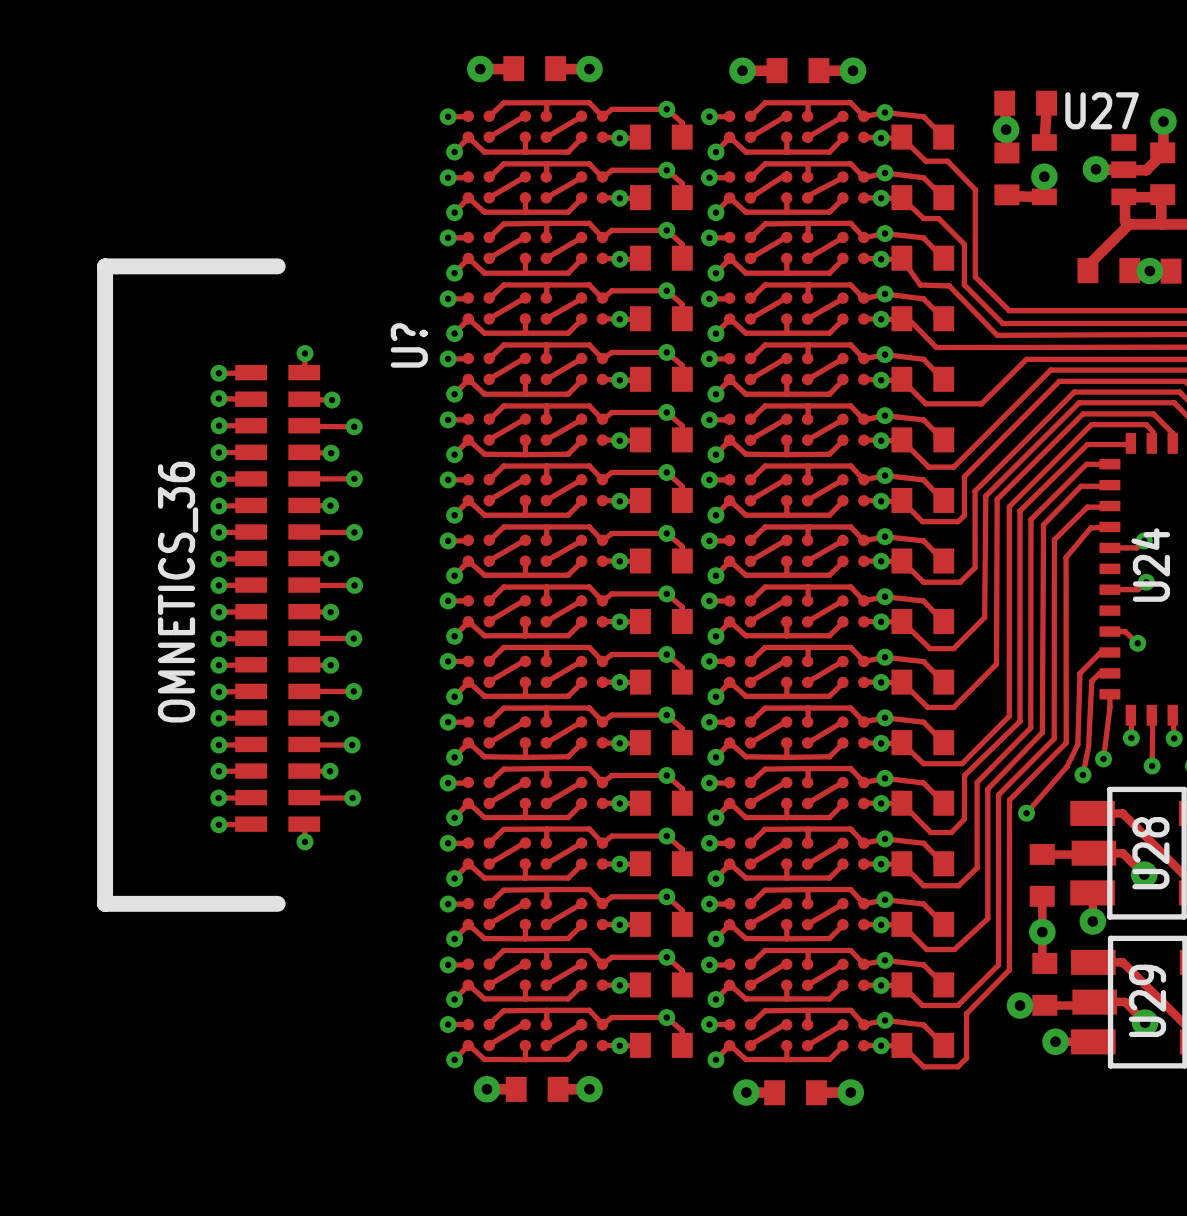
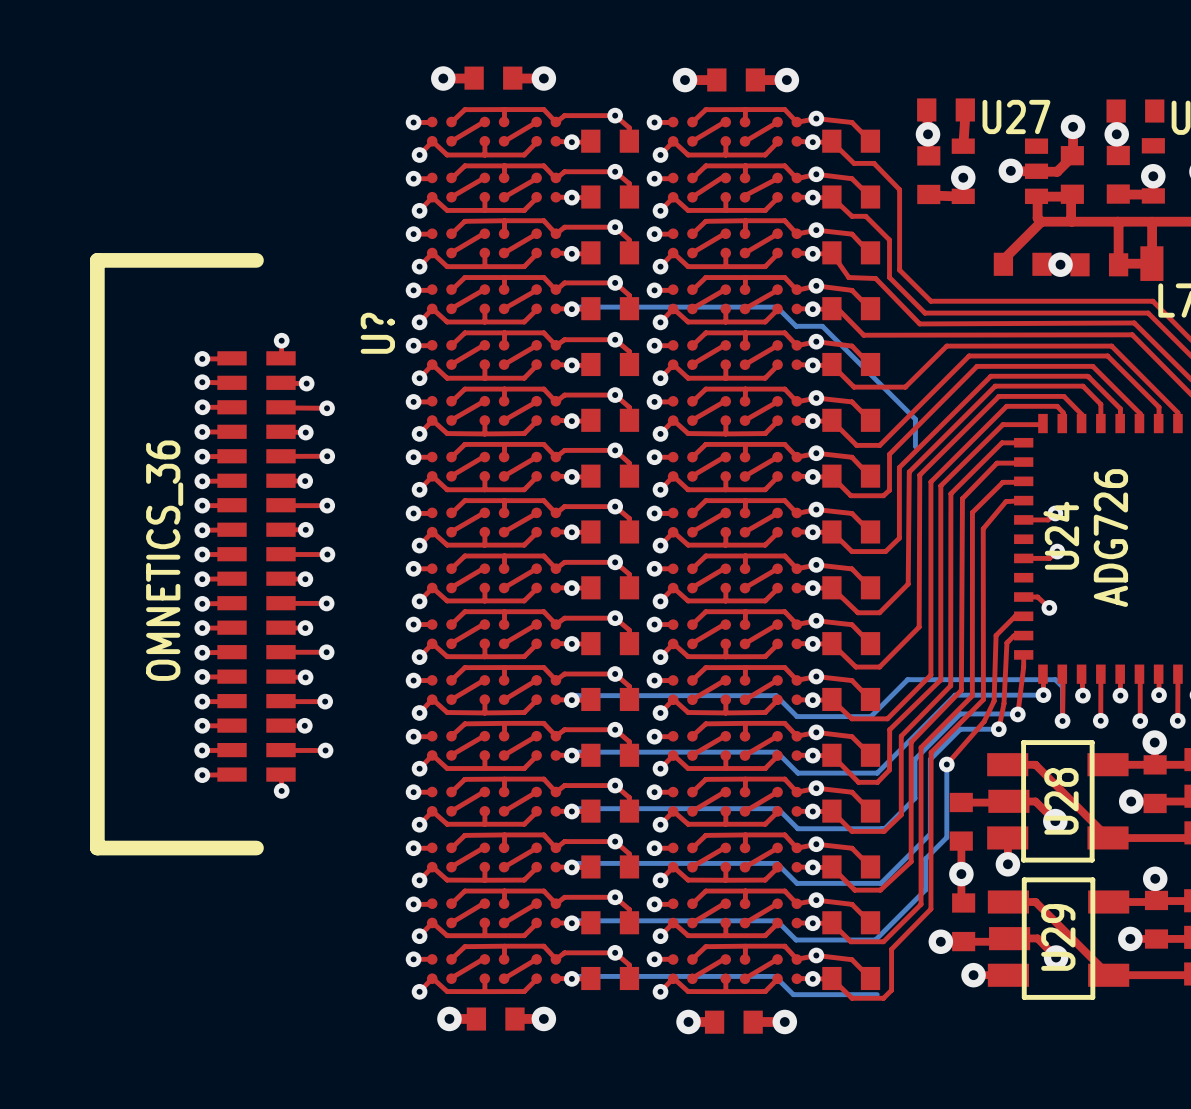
bottom track: none -> (571, 309) (574, 307) (776, 307) (796, 326) (822, 326) (915, 419) (915, 446)
bottom track: none -> (1043, 695) (955, 695) (877, 773) (797, 773) (776, 752) (575, 752) (571, 755)
bottom track: none -> (571, 700) (576, 695) (776, 695) (797, 716) (870, 716) (907, 679) (1055, 679) (1062, 686) (1062, 721)
bottom track: none -> (1017, 713) (960, 713) (914, 759) (914, 798) (884, 828) (797, 828) (777, 808) (574, 808) (571, 811)
bottom track: none -> (998, 729) (960, 729) (930, 759) (930, 834) (880, 883) (797, 883) (776, 863) (575, 863) (571, 867)
bottom track: none -> (946, 764) (946, 837) (925, 858) (925, 889) (875, 940) (796, 940) (776, 920) (574, 920) (571, 923)
bottom track: none -> (571, 978) (574, 976) (775, 976) (793, 994) (877, 994)

